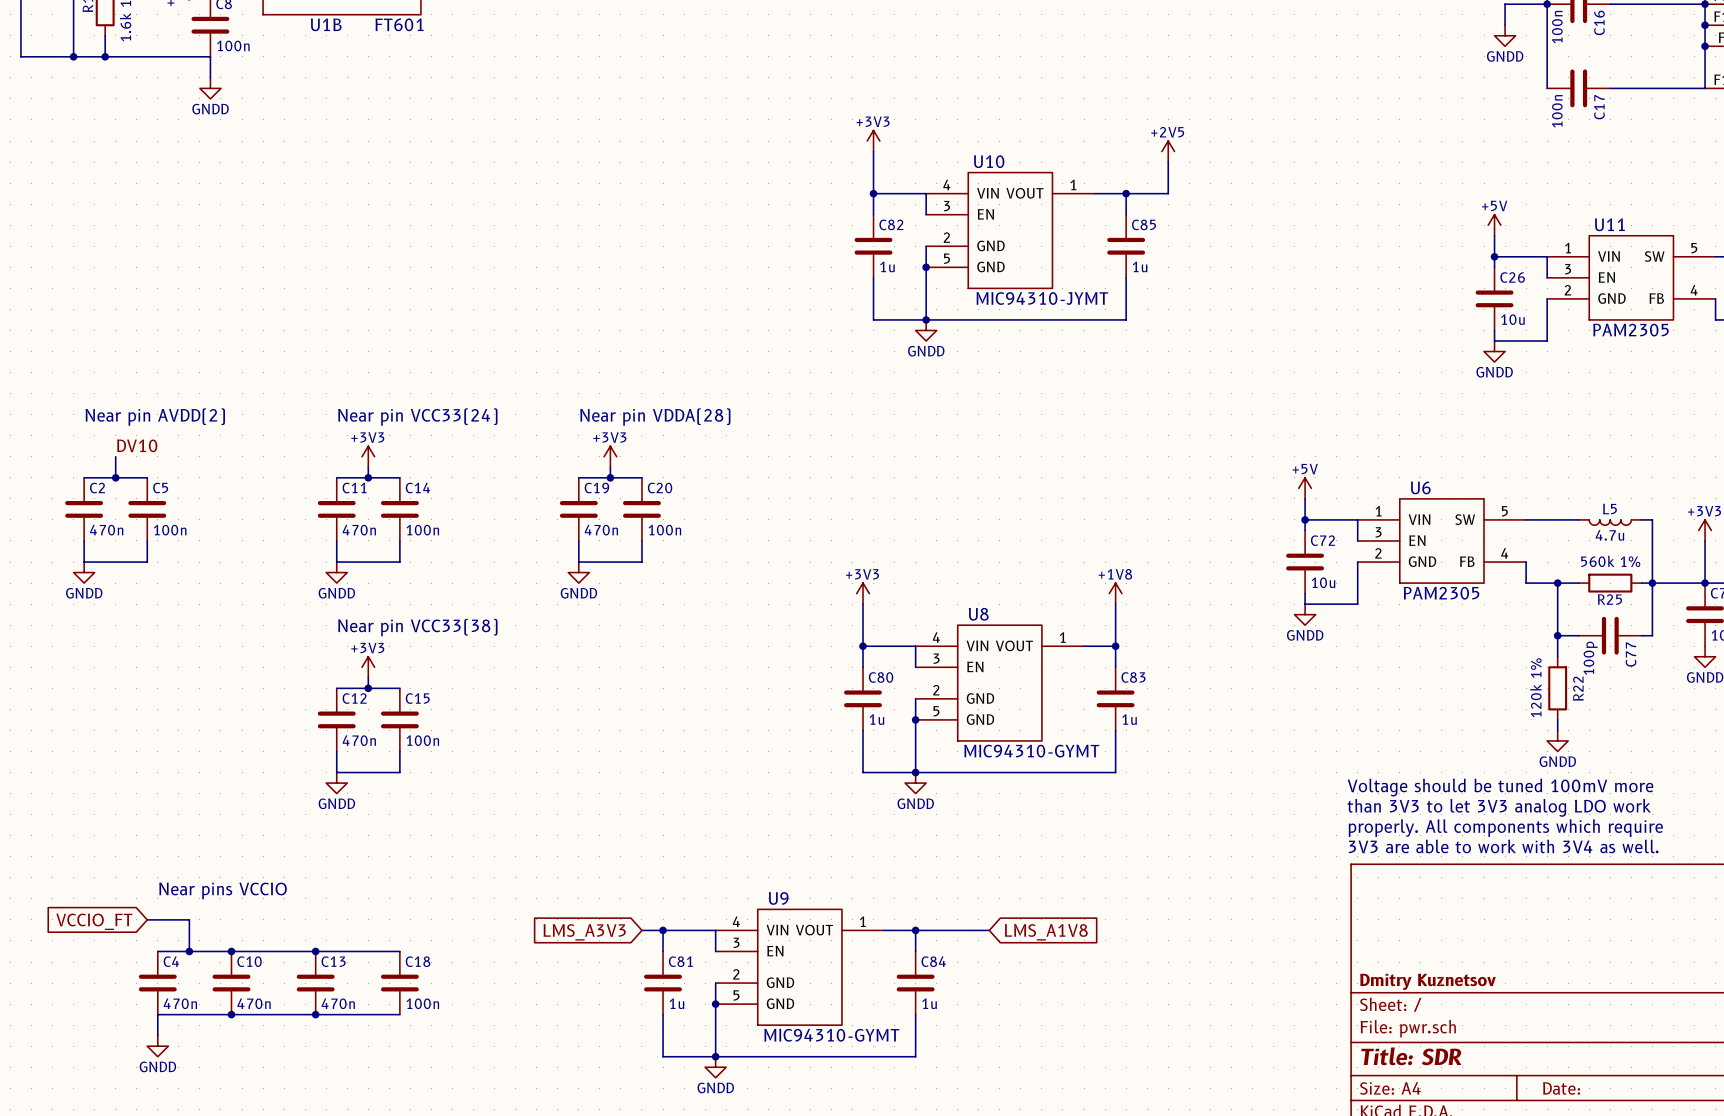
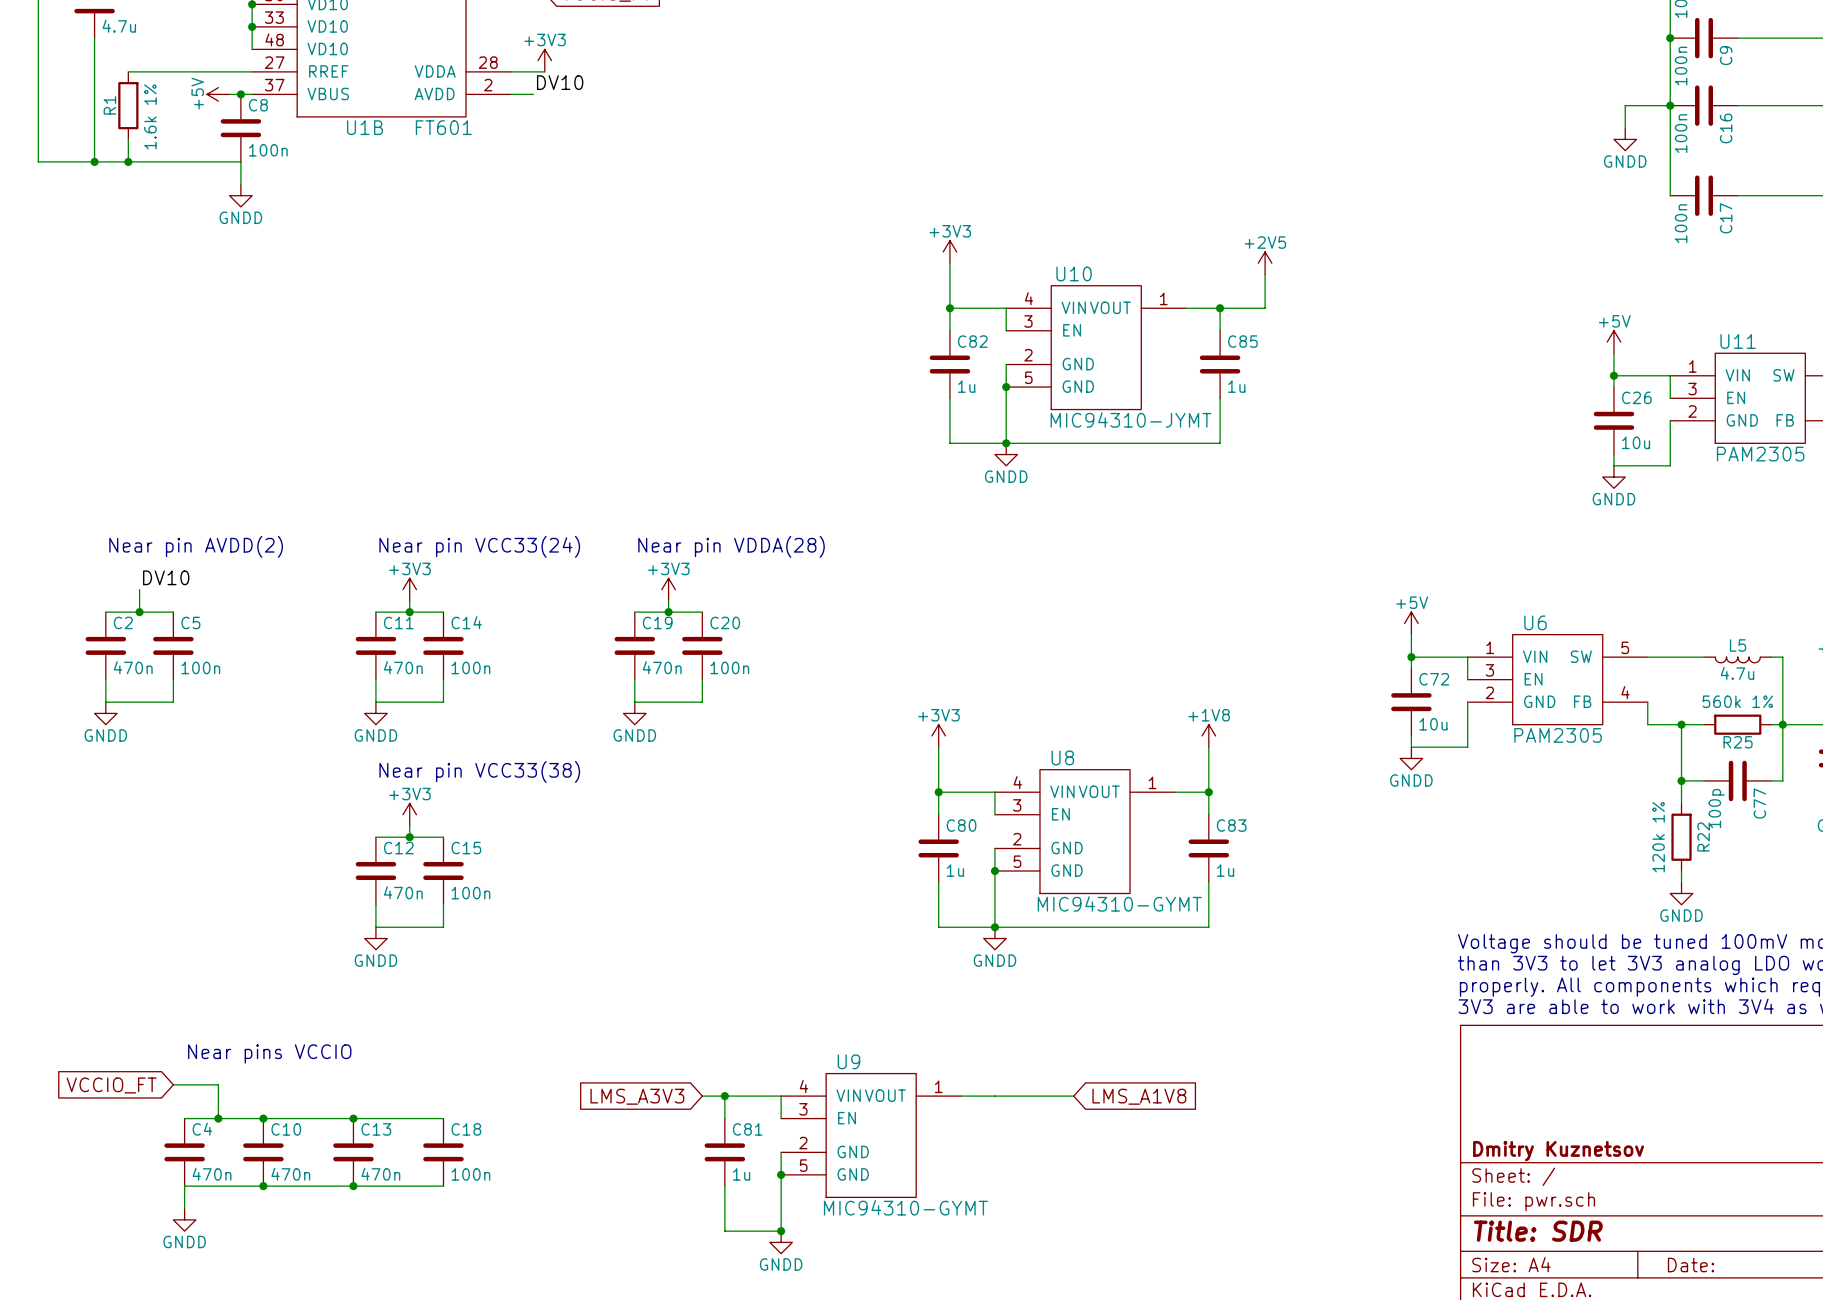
wire: (915, 930) (915, 951) -> none
junction: (915, 930) -> none
C84: 1u (915, 983) -> none
wire: (915, 1014) (915, 1056) (715, 1056) -> none

